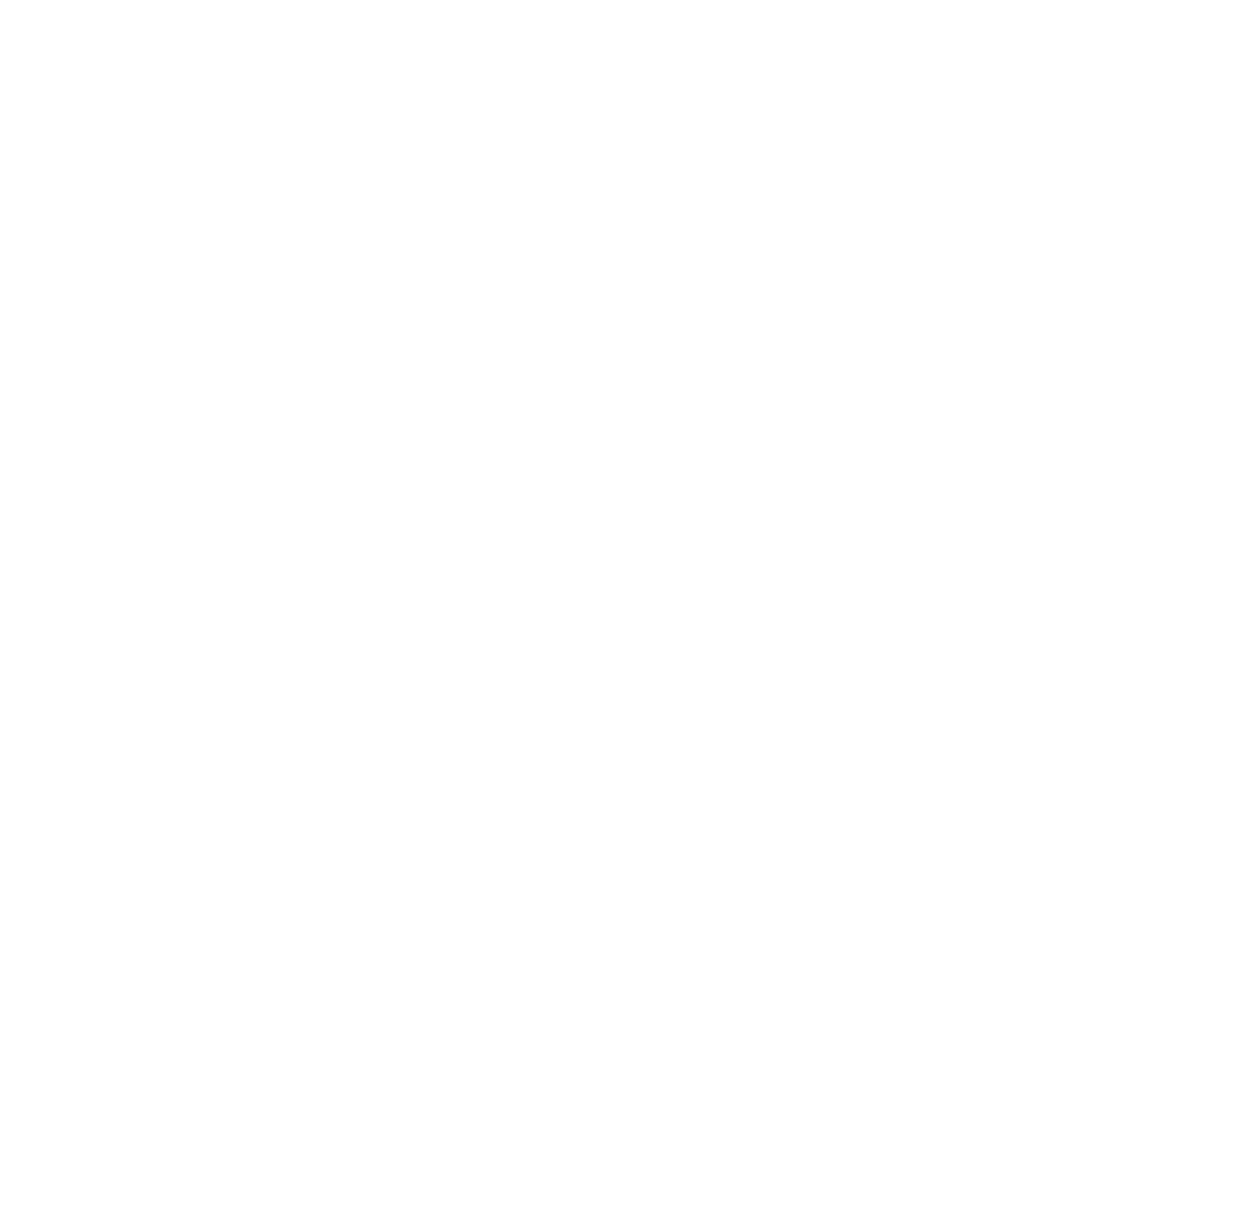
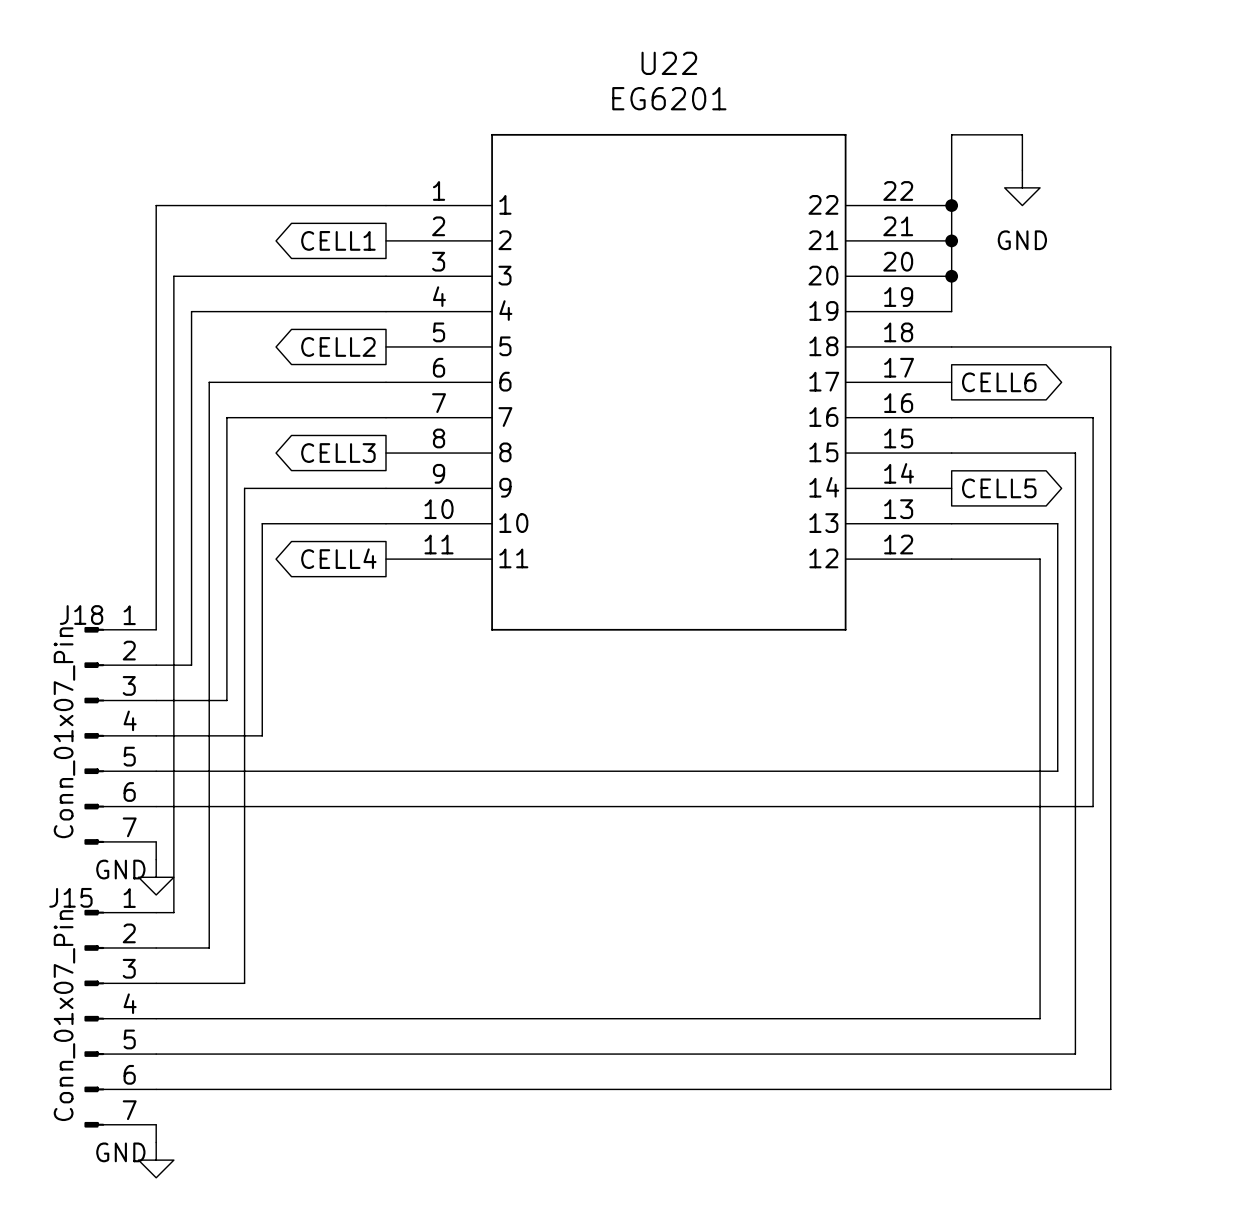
wire: none -> (1022, 170) (1022, 134) (951, 134) (951, 311)
power symbol: none -> GND (1022, 187)
wire: none -> (386, 205) (156, 205) (156, 629)
junction: none -> (951, 205)
global label: none -> CELL1 (338, 240)
junction: none -> (951, 240)
wire: none -> (386, 276) (173, 276) (173, 912) (156, 912)
junction: none -> (951, 276)
wire: none -> (386, 311) (191, 311) (191, 665) (156, 665)
global label: none -> CELL2 (338, 346)
wire: none -> (951, 346) (1110, 346) (1110, 1089) (156, 1089)
wire: none -> (386, 382) (209, 382) (209, 947) (156, 947)
U22: none -> EG6201 (668, 382)
global label: none -> CELL6 (999, 382)
wire: none -> (386, 417) (226, 417) (226, 700) (156, 700)
wire: none -> (951, 417) (1093, 417) (1093, 806) (156, 806)
global label: none -> CELL3 (338, 453)
wire: none -> (951, 453) (1075, 453) (1075, 1054) (156, 1054)
wire: none -> (386, 488) (244, 488) (244, 983) (156, 983)
global label: none -> CELL5 (999, 488)
wire: none -> (386, 523) (262, 523) (262, 735) (156, 735)
wire: none -> (951, 523) (1057, 523) (1057, 771) (156, 771)
global label: none -> CELL4 (338, 558)
wire: none -> (951, 559) (1040, 559) (1040, 1018) (156, 1018)
J18: none -> Conn_01x07_Pin (120, 735)
wire: none -> (156, 841) (156, 859)
power symbol: none -> GND (156, 877)
J15: none -> Conn_01x07_Pin (120, 1018)
wire: none -> (156, 1124) (156, 1142)
power symbol: none -> GND (156, 1160)

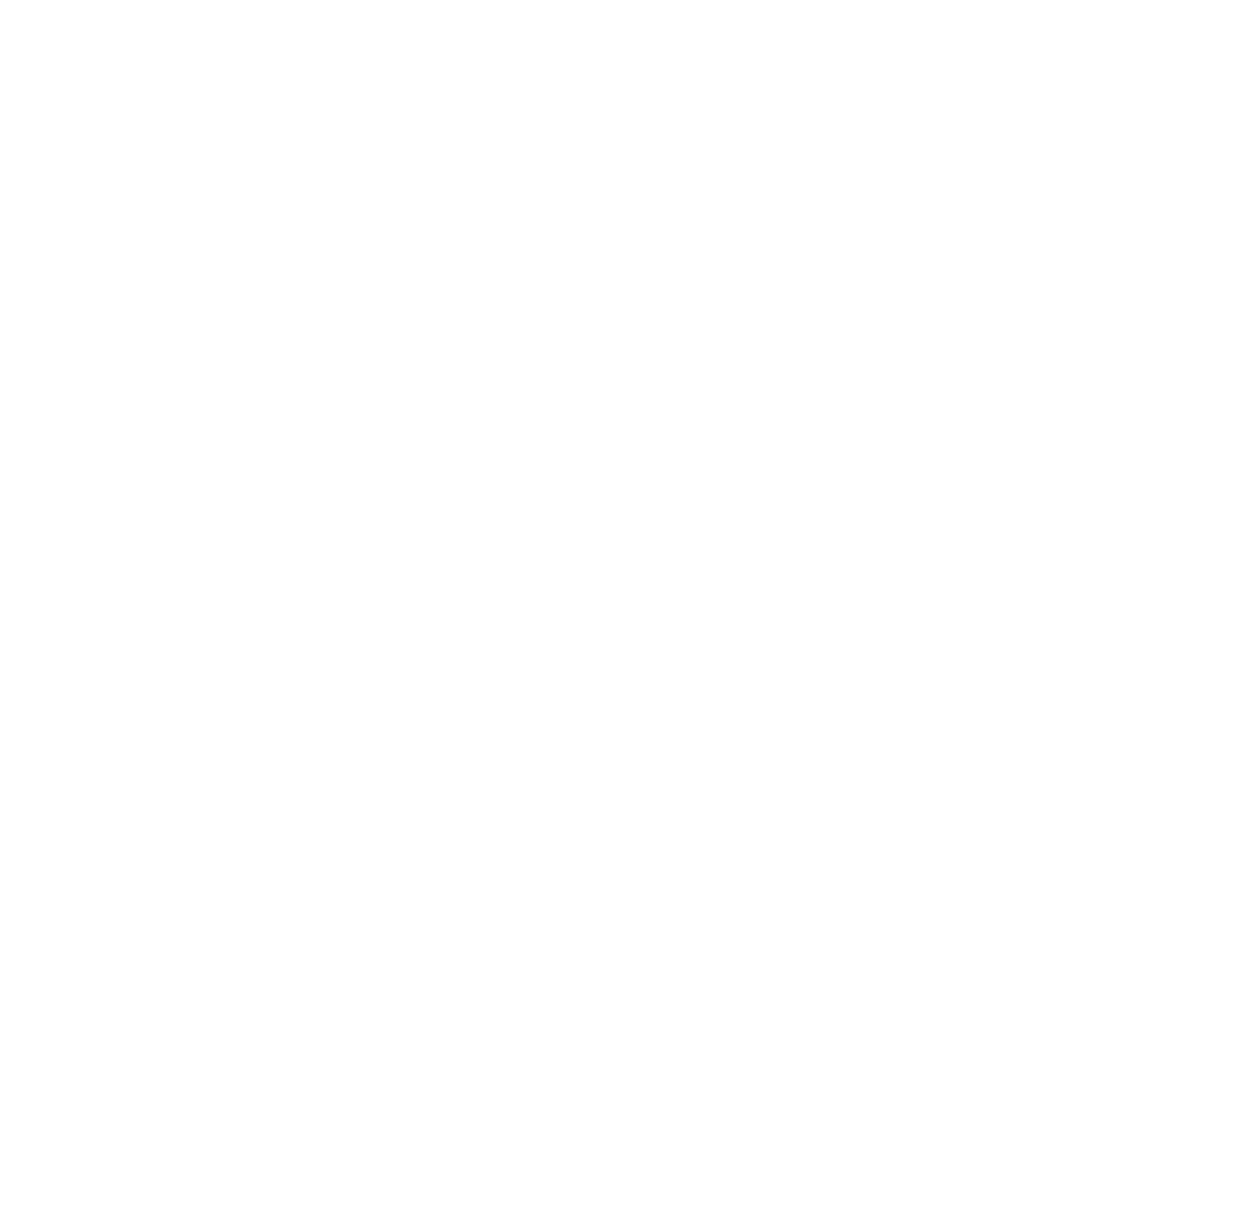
wire: (1022, 170) (1022, 134) (951, 134) (951, 311) -> none
power symbol: GND (1022, 187) -> none
wire: (386, 205) (156, 205) (156, 629) -> none
junction: (951, 205) -> none
global label: CELL1 (338, 240) -> none
junction: (951, 240) -> none
wire: (386, 276) (173, 276) (173, 912) (156, 912) -> none
junction: (951, 276) -> none
wire: (386, 311) (191, 311) (191, 665) (156, 665) -> none
global label: CELL2 (338, 346) -> none
wire: (951, 346) (1110, 346) (1110, 1089) (156, 1089) -> none
wire: (386, 382) (209, 382) (209, 947) (156, 947) -> none
U22: EG6201 (668, 382) -> none
global label: CELL6 (999, 382) -> none
wire: (386, 417) (226, 417) (226, 700) (156, 700) -> none
wire: (951, 417) (1093, 417) (1093, 806) (156, 806) -> none
global label: CELL3 (338, 453) -> none
wire: (951, 453) (1075, 453) (1075, 1054) (156, 1054) -> none
wire: (386, 488) (244, 488) (244, 983) (156, 983) -> none
global label: CELL5 (999, 488) -> none
wire: (386, 523) (262, 523) (262, 735) (156, 735) -> none
wire: (951, 523) (1057, 523) (1057, 771) (156, 771) -> none
global label: CELL4 (338, 558) -> none
wire: (951, 559) (1040, 559) (1040, 1018) (156, 1018) -> none
J18: Conn_01x07_Pin (120, 735) -> none
wire: (156, 841) (156, 859) -> none
power symbol: GND (156, 877) -> none
J15: Conn_01x07_Pin (120, 1018) -> none
wire: (156, 1124) (156, 1142) -> none
power symbol: GND (156, 1160) -> none

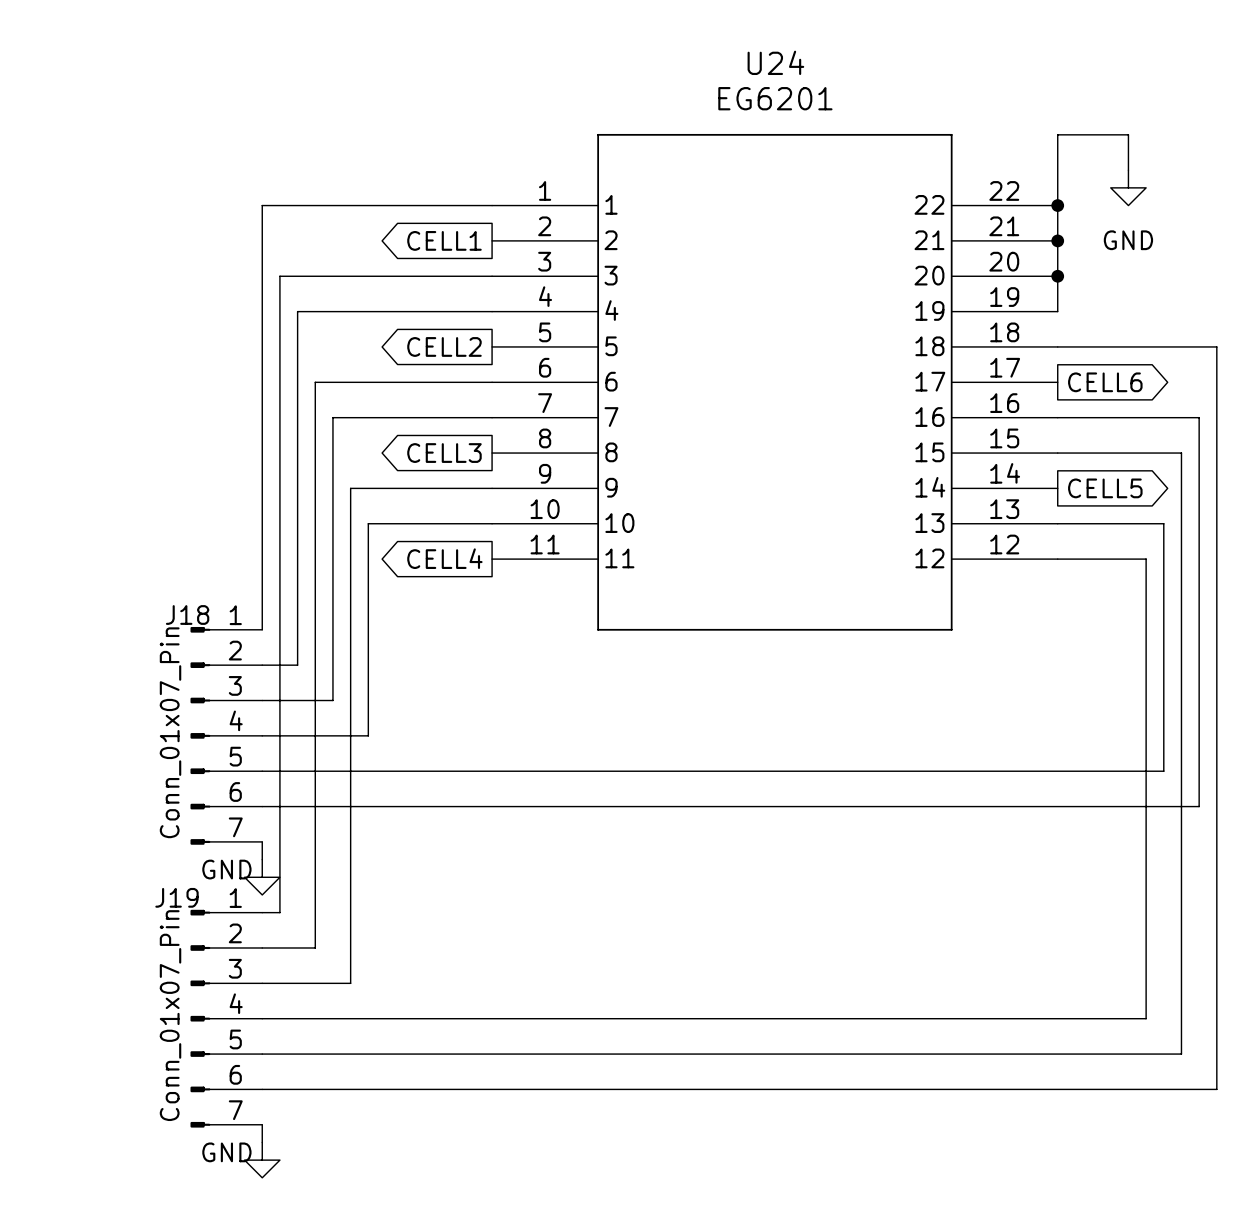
wire: none -> (1128, 170) (1128, 134) (1057, 134) (1057, 311)
power symbol: none -> GND (1128, 187)
wire: none -> (492, 205) (262, 205) (262, 629)
junction: none -> (1057, 205)
global label: none -> CELL1 (444, 240)
junction: none -> (1057, 240)
wire: none -> (492, 276) (279, 276) (279, 912) (262, 912)
junction: none -> (1057, 276)
wire: none -> (492, 311) (297, 311) (297, 665) (262, 665)
global label: none -> CELL2 (444, 346)
wire: none -> (1057, 346) (1216, 346) (1216, 1089) (262, 1089)
wire: none -> (492, 382) (315, 382) (315, 947) (262, 947)
U24: none -> EG6201 (774, 382)
global label: none -> CELL6 (1105, 382)
wire: none -> (492, 417) (332, 417) (332, 700) (262, 700)
wire: none -> (1057, 417) (1199, 417) (1199, 806) (262, 806)
global label: none -> CELL3 (444, 453)
wire: none -> (1057, 453) (1181, 453) (1181, 1054) (262, 1054)
wire: none -> (492, 488) (350, 488) (350, 983) (262, 983)
global label: none -> CELL5 (1105, 488)
wire: none -> (492, 523) (368, 523) (368, 735) (262, 735)
wire: none -> (1057, 523) (1163, 523) (1163, 771) (262, 771)
global label: none -> CELL4 (444, 558)
wire: none -> (1057, 559) (1146, 559) (1146, 1018) (262, 1018)
J18: none -> Conn_01x07_Pin (226, 735)
wire: none -> (262, 841) (262, 859)
power symbol: none -> GND (262, 877)
J19: none -> Conn_01x07_Pin (226, 1018)
wire: none -> (262, 1124) (262, 1142)
power symbol: none -> GND (262, 1160)

